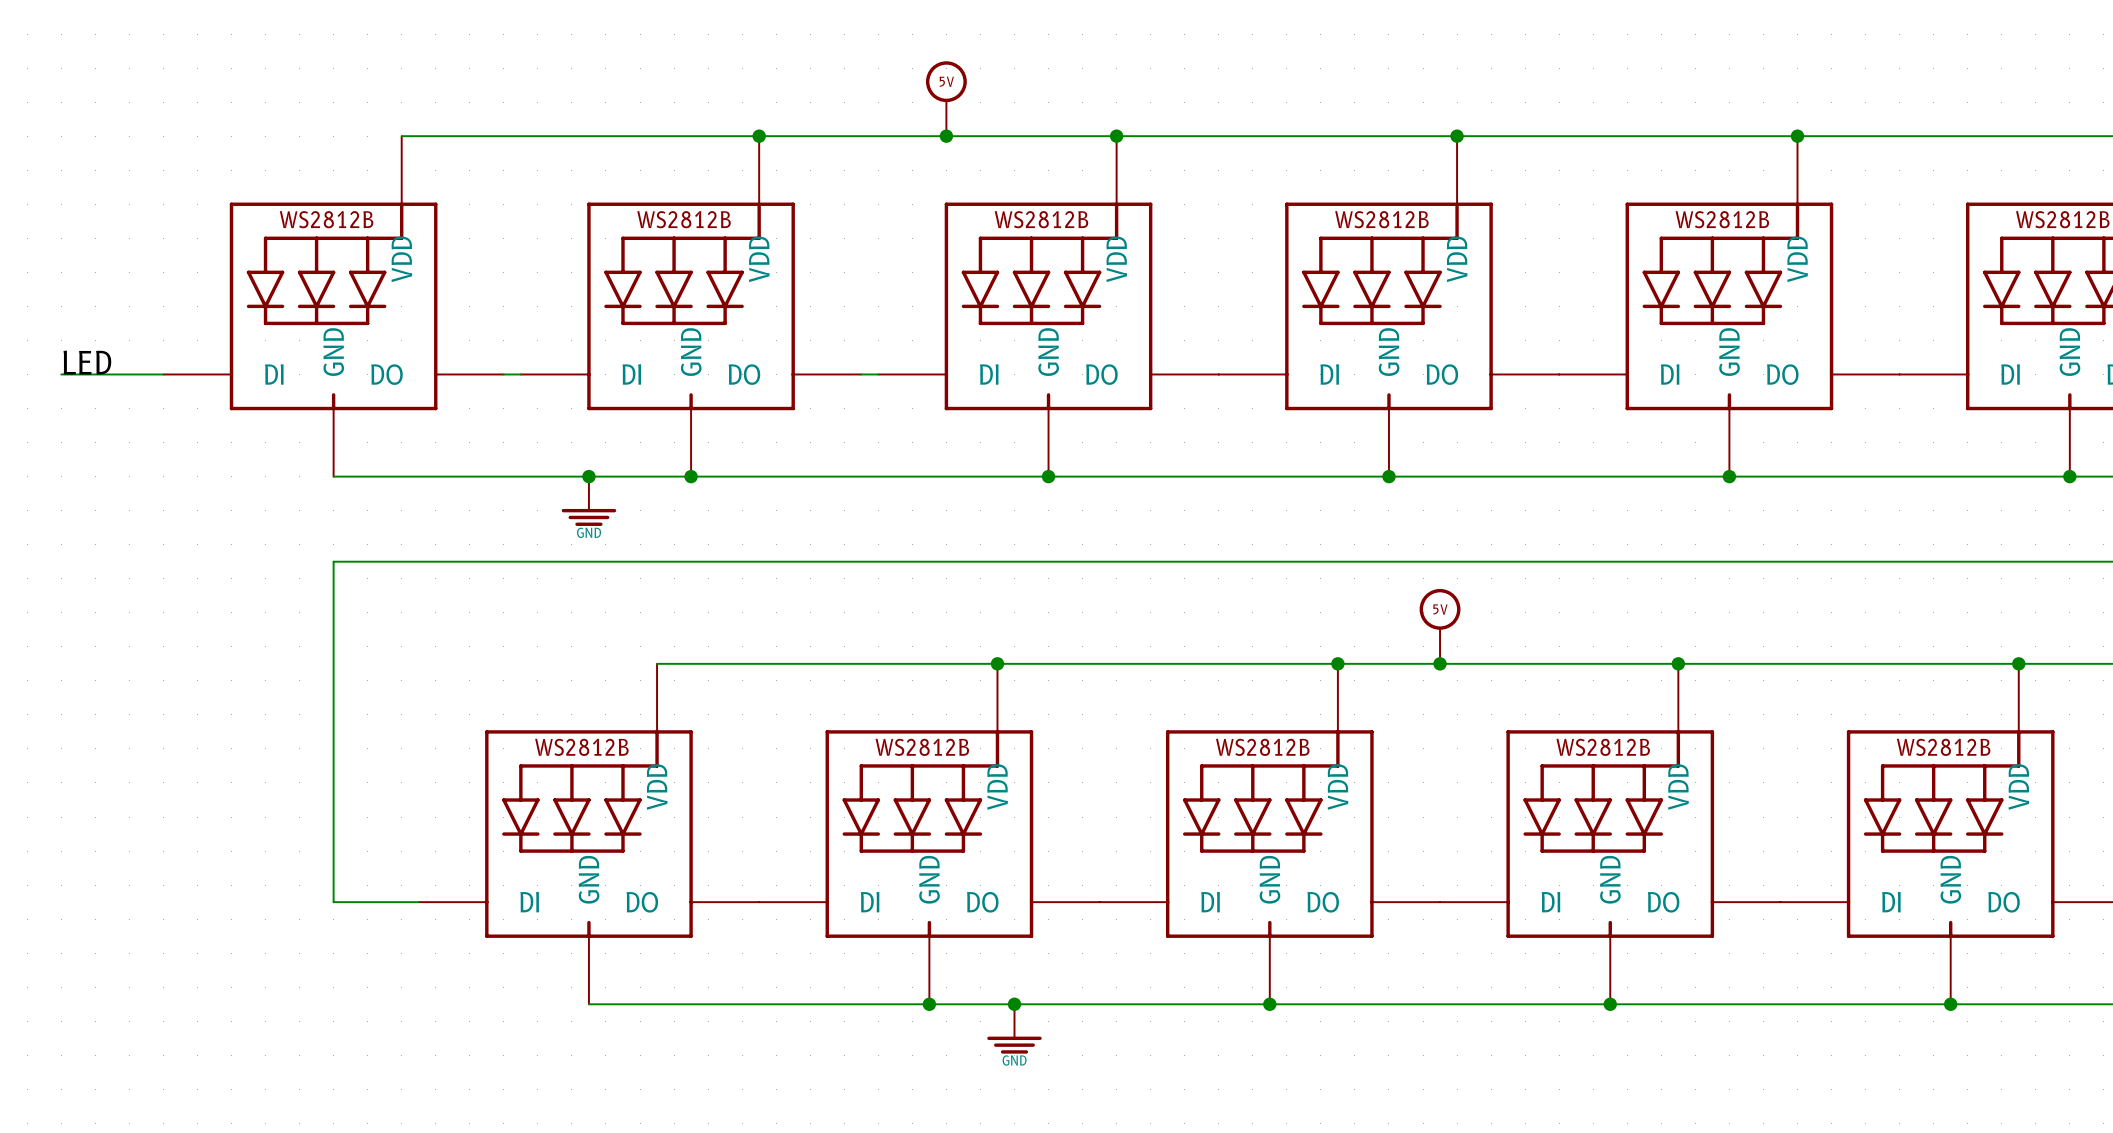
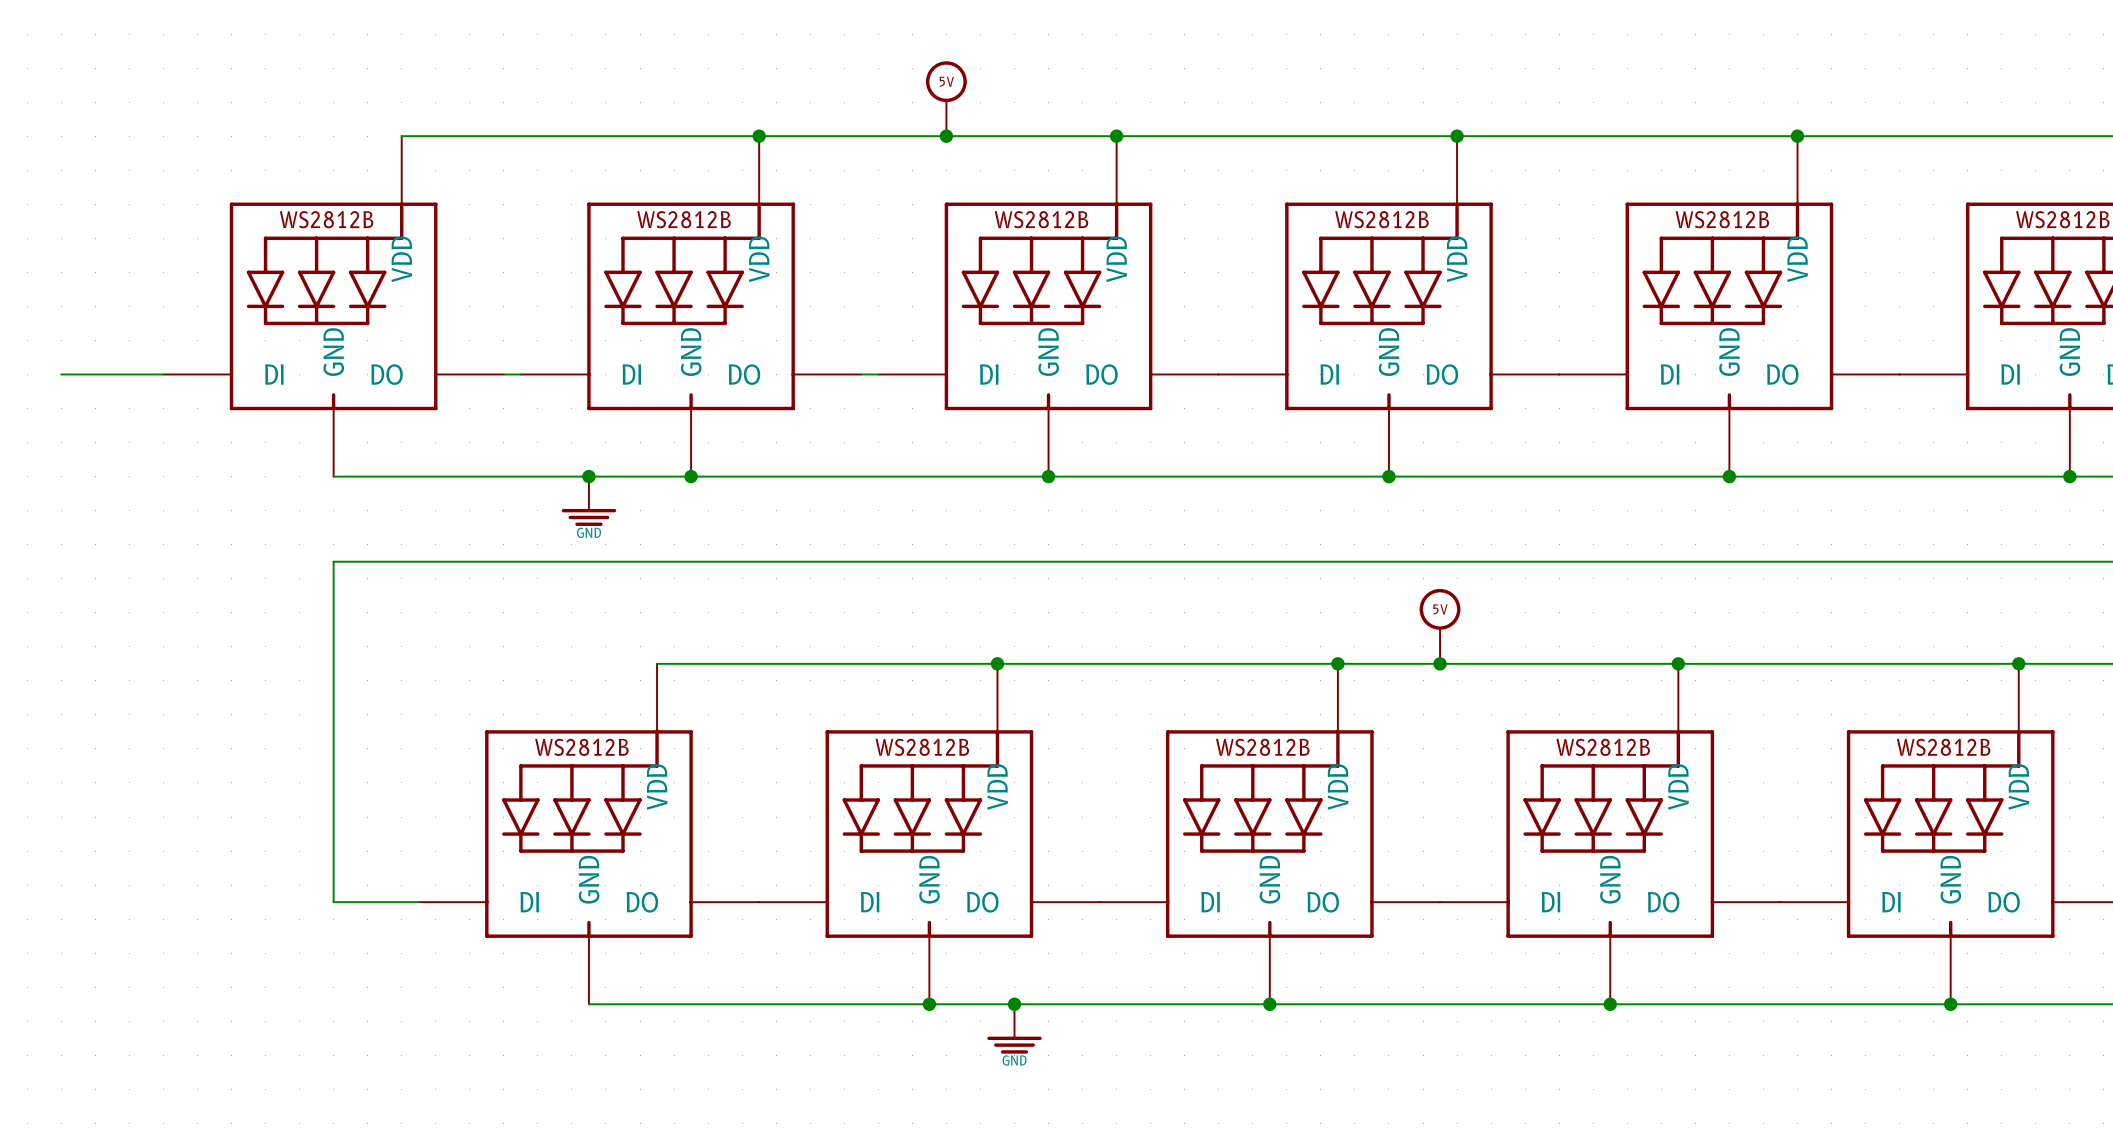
label: LED (87, 362) -> none

